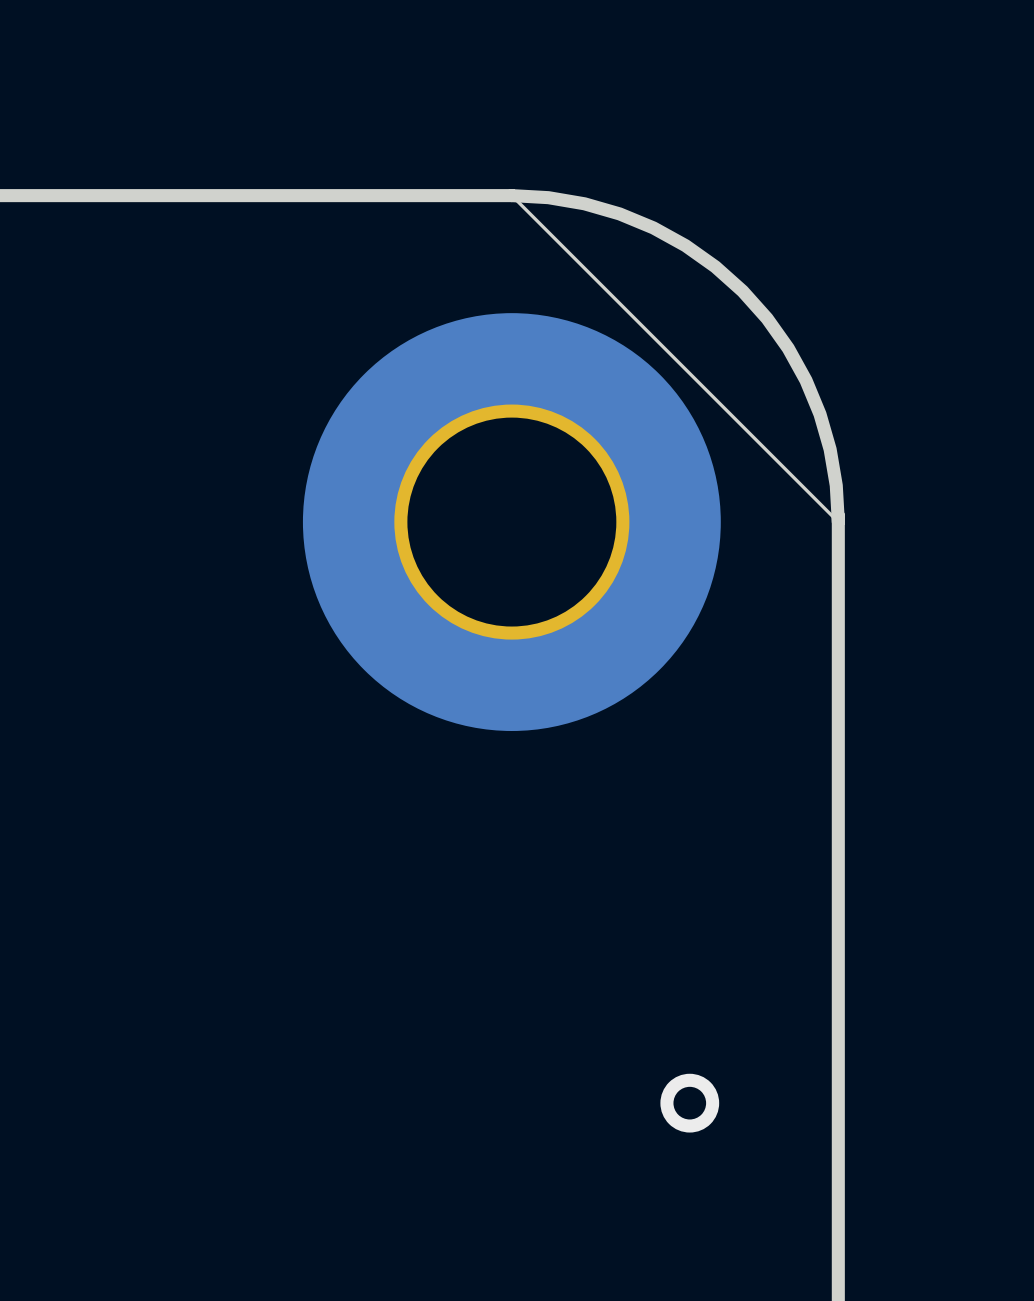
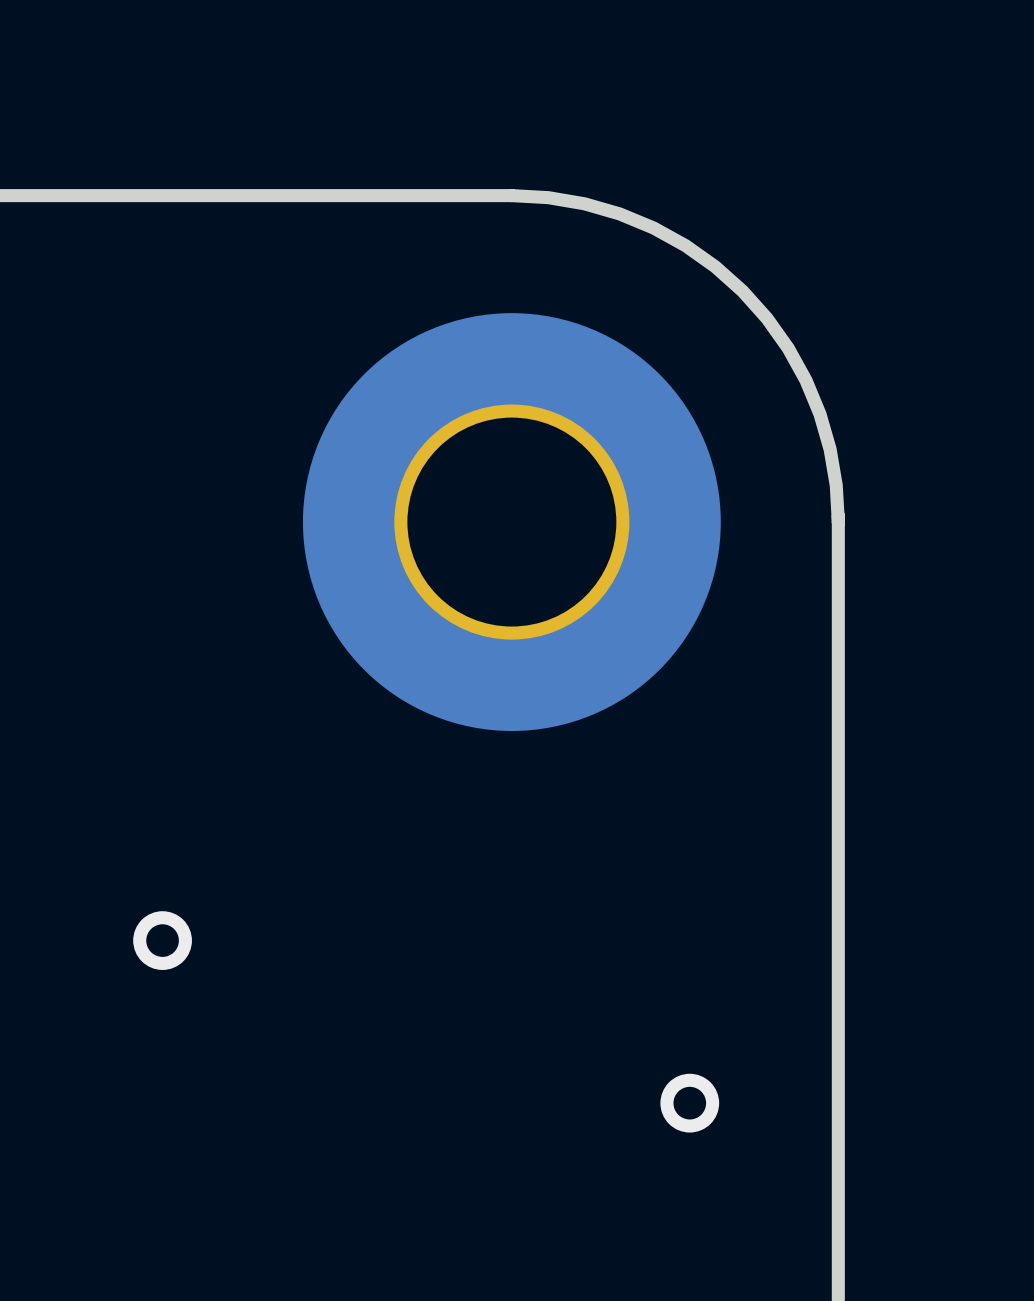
board edge: (511, 195) (838, 522) -> none
via: none -> (162, 940)

